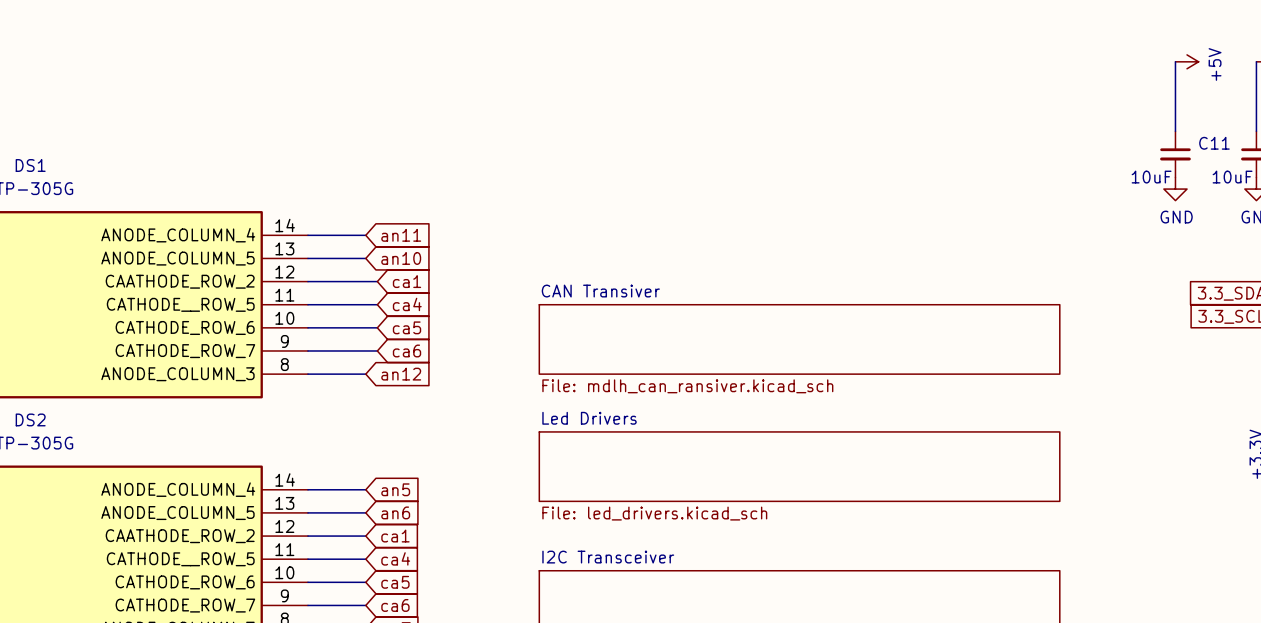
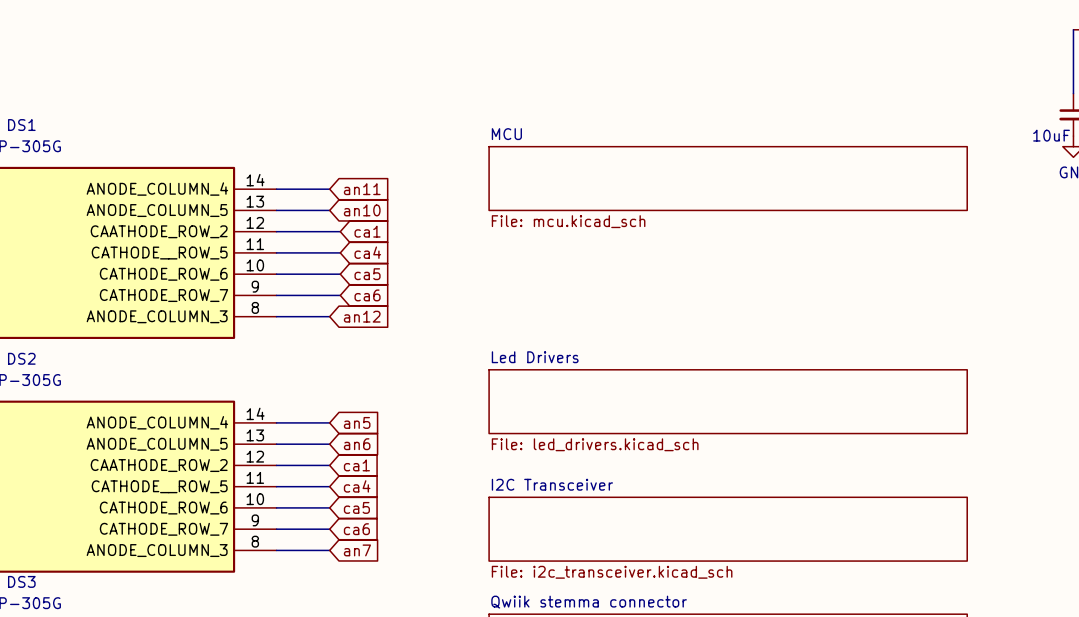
sheet MCU: none -> File: mcu.kicad_sch (728, 178)
sheet CAN Transiver: File: mdlh_can_ransiver.kicad_sch (799, 339) -> none

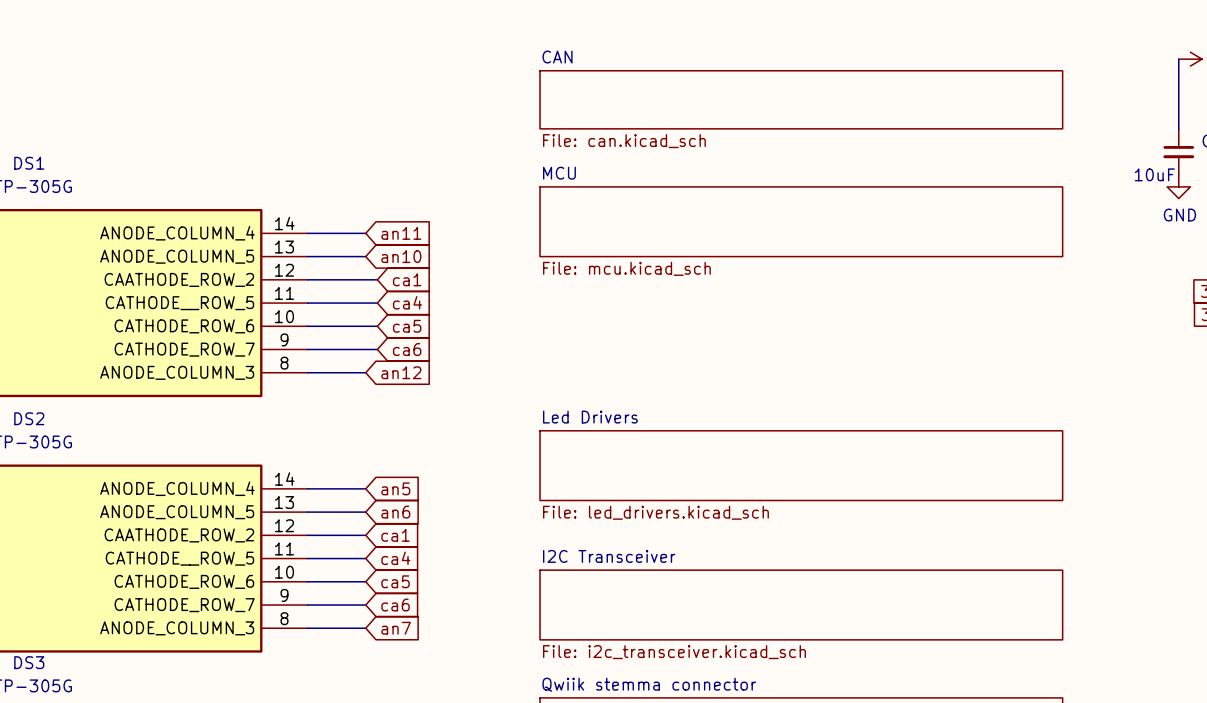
sheet CAN: none -> File: can.kicad_sch (801, 99)

